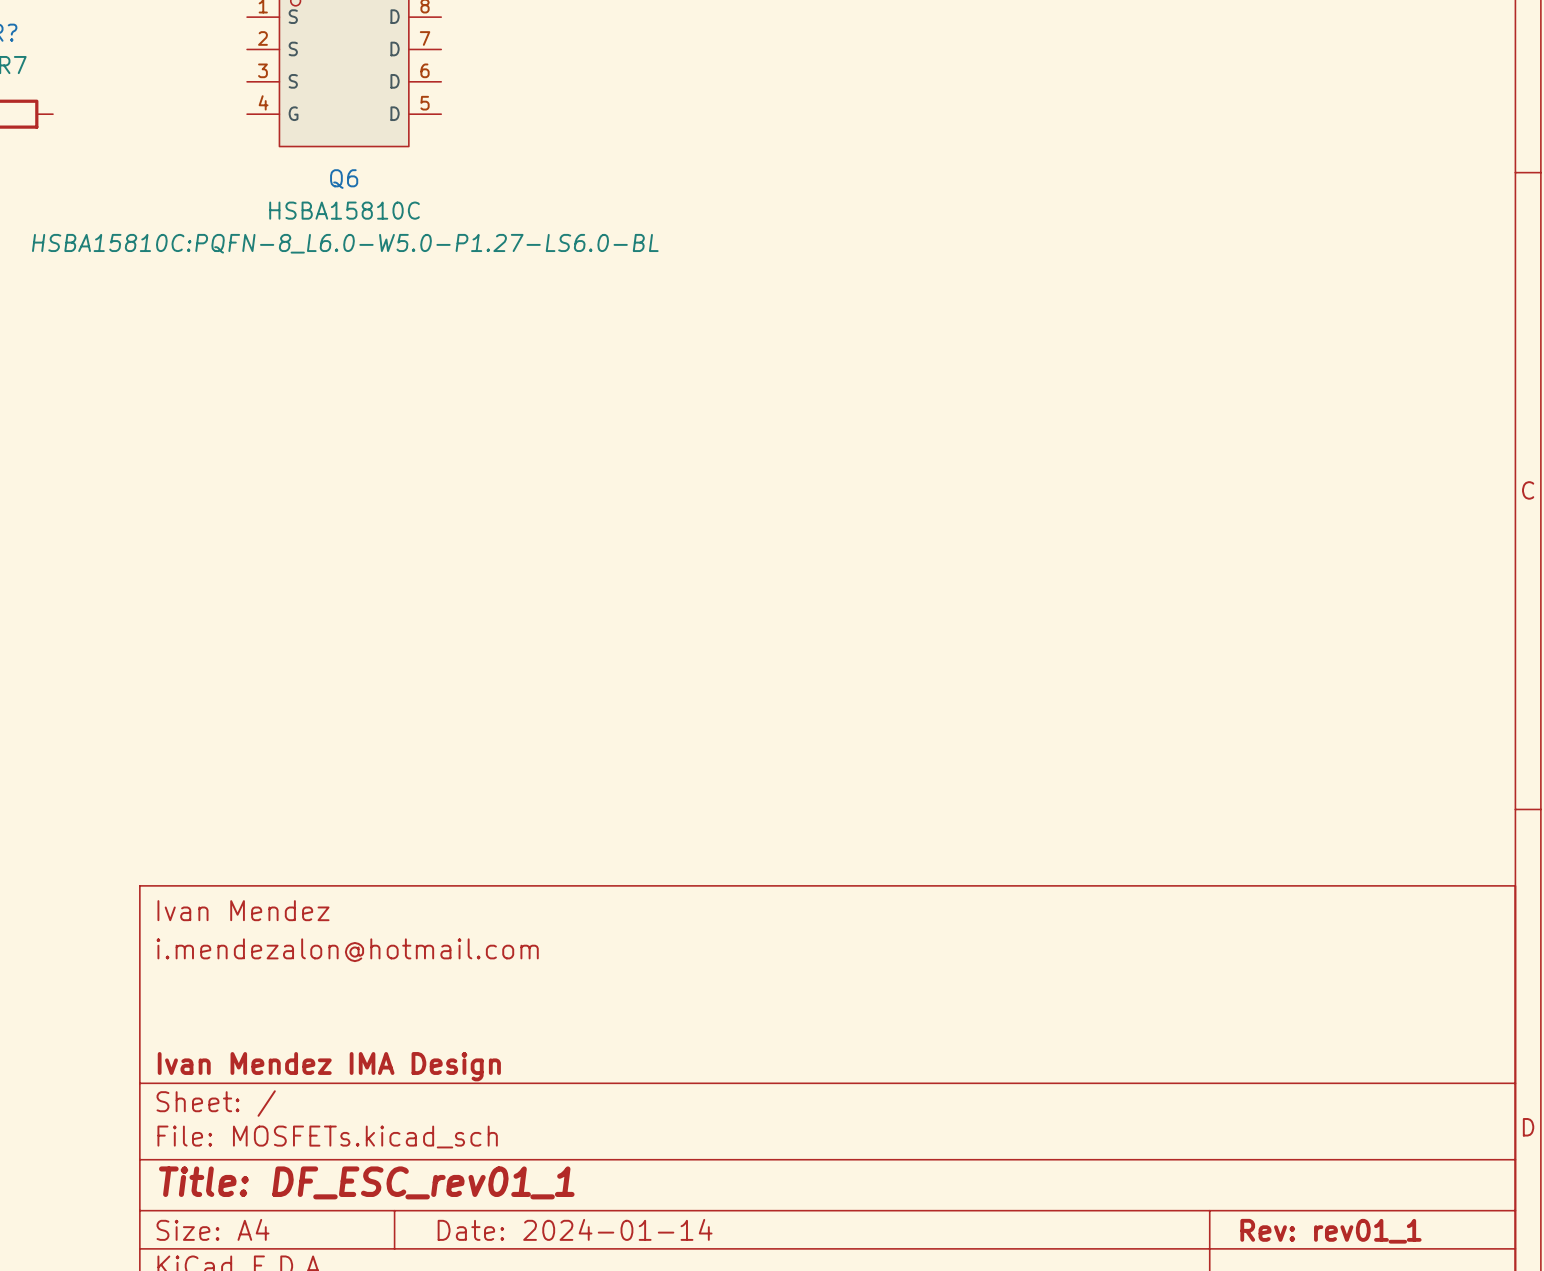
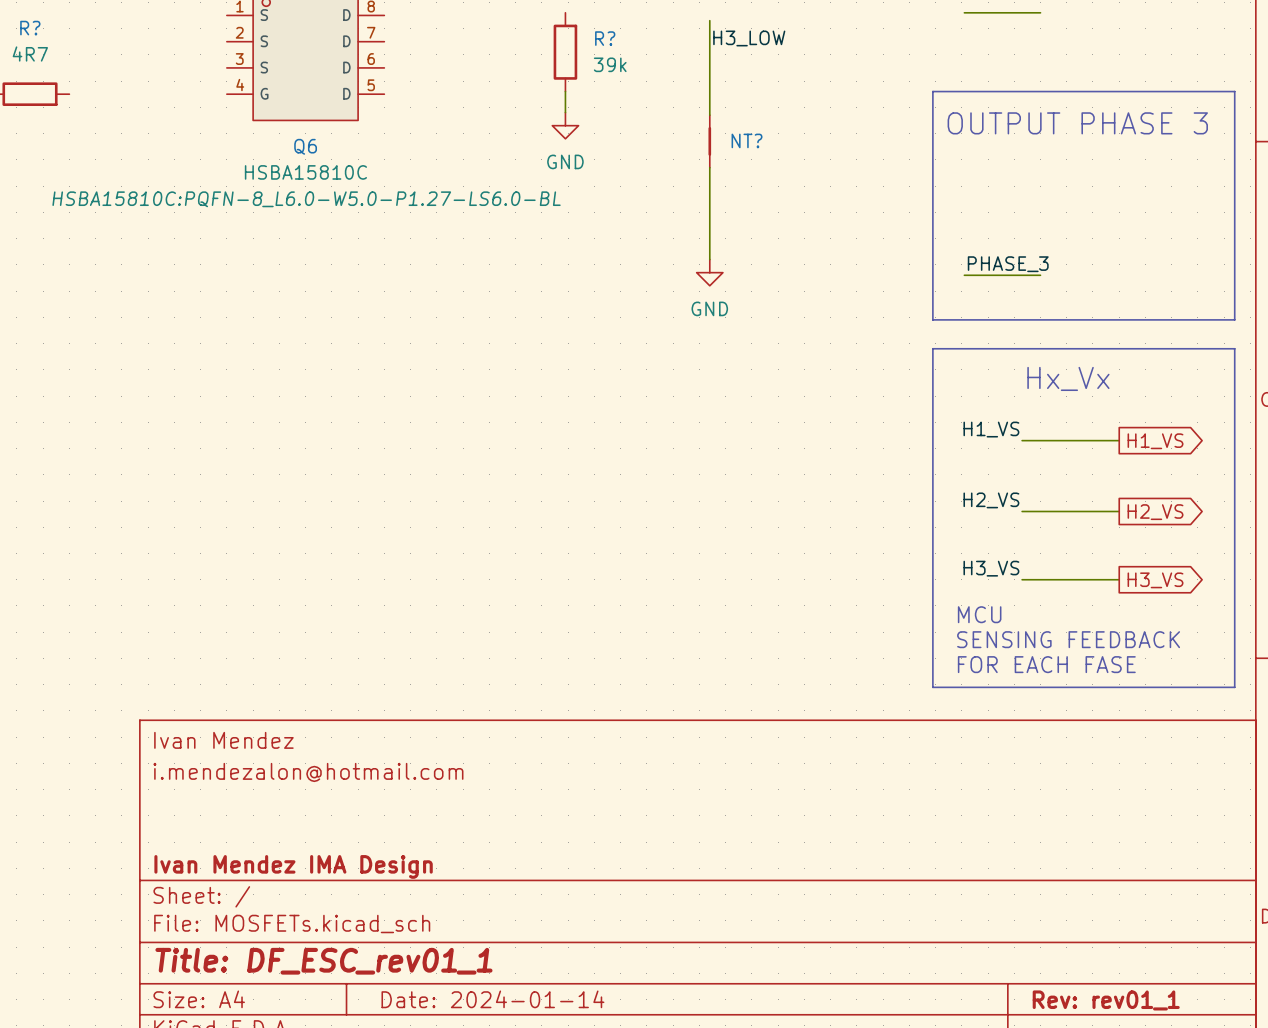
wire: none -> (964, 12) (1040, 12)
wire: none -> (709, 20) (709, 115)
label: none -> H3_LOW (749, 38)
R?: none -> 39k (565, 52)
wire: none -> (565, 91) (565, 112)
line: none -> (932, 91) (932, 319) (1234, 319) (1234, 91) (932, 91)
text: none -> OUTPUT PHASE 3 (1077, 123)
power symbol: none -> GND (565, 125)
NT?: none -> (709, 141)
wire: none -> (709, 167) (709, 259)
label: none -> PHASE_3 (1008, 264)
power symbol: none -> GND (709, 272)
wire: none -> (964, 275) (1040, 275)
line: none -> (932, 348) (1234, 348) (1234, 687) (932, 687) (932, 348)
text: none -> Hx_Vx (1068, 378)
label: none -> H1_VS (991, 429)
wire: none -> (1022, 440) (1119, 440)
global label: none -> H1_VS (1155, 441)
label: none -> H2_VS (991, 500)
wire: none -> (1022, 511) (1119, 511)
global label: none -> H2_VS (1155, 512)
label: none -> H3_VS (991, 568)
wire: none -> (1022, 579) (1119, 579)
global label: none -> H3_VS (1155, 580)
text: none -> MCU (979, 614)
text: none -> SENSING FEEDBACK (1068, 639)
text: none -> FOR EACH FASE (1046, 664)

